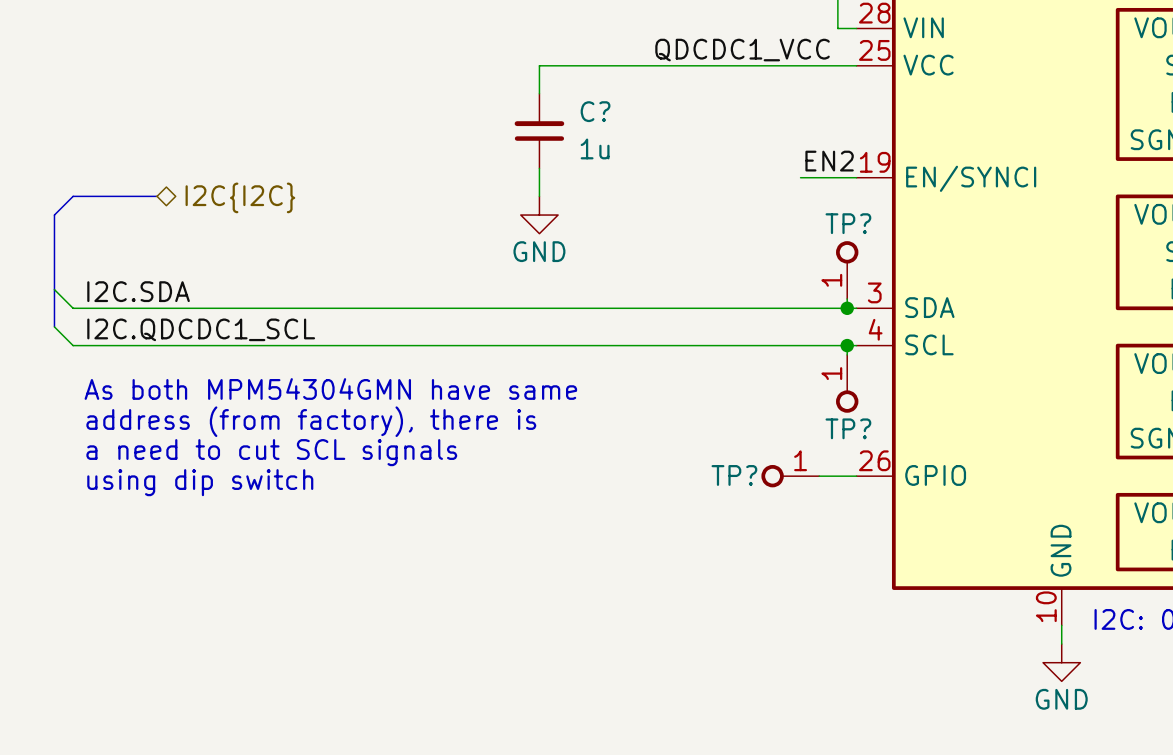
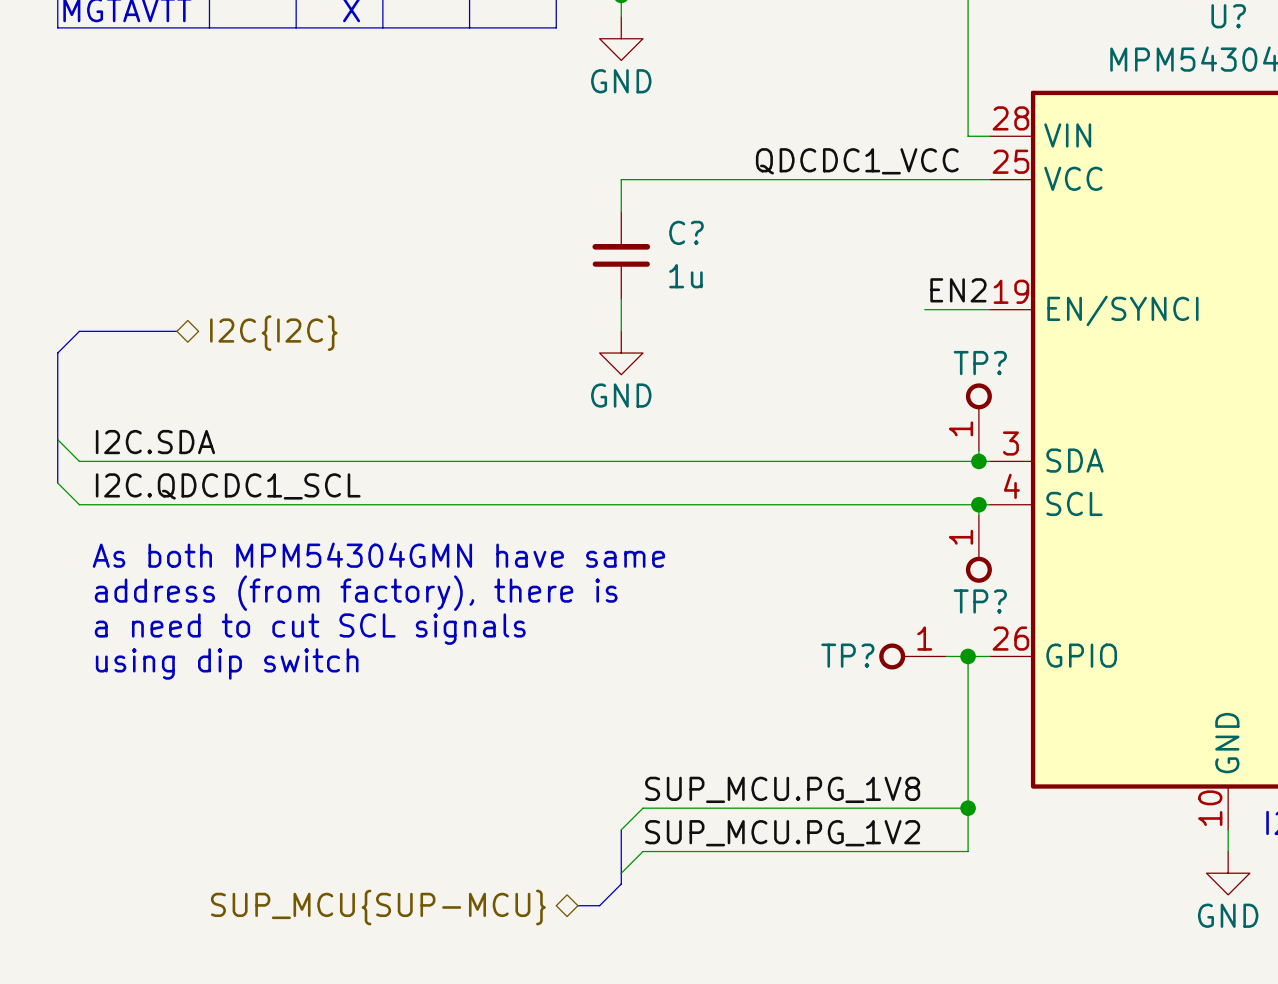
wire: none -> (968, 656) (968, 851) (642, 851) (621, 873)
junction: none -> (968, 656)
label: none -> SUP_MCU.PG_1V8 (782, 789)
wire: none -> (968, 808) (642, 808) (621, 829)
junction: none -> (968, 808)
bus: none -> (621, 829) (621, 884) (599, 905) (577, 905)
label: none -> SUP_MCU.PG_1V2 (782, 833)
hierarchical label: none -> SUP_MCU{SUP-MCU} (378, 907)

